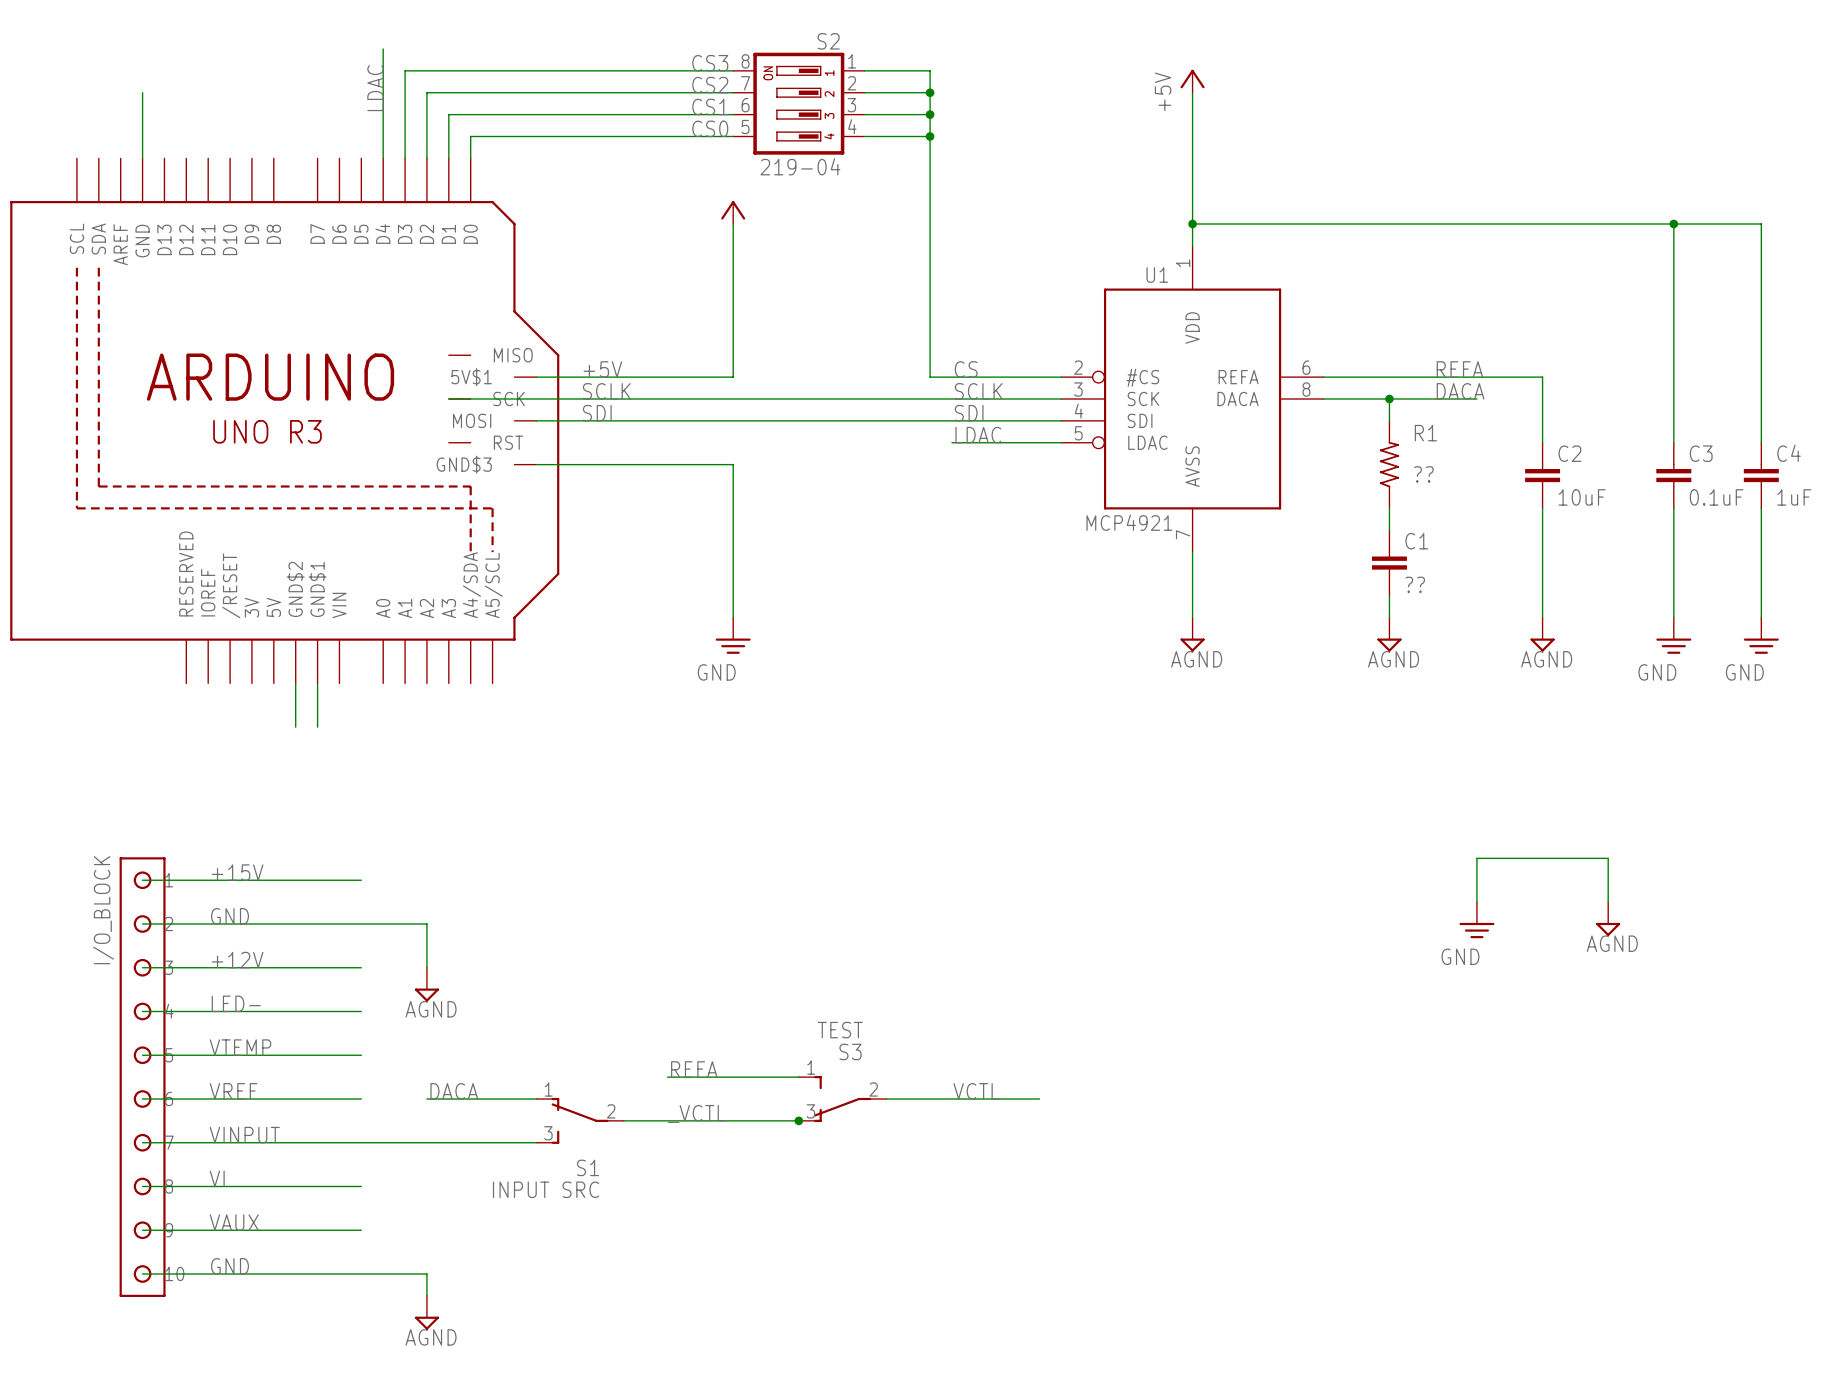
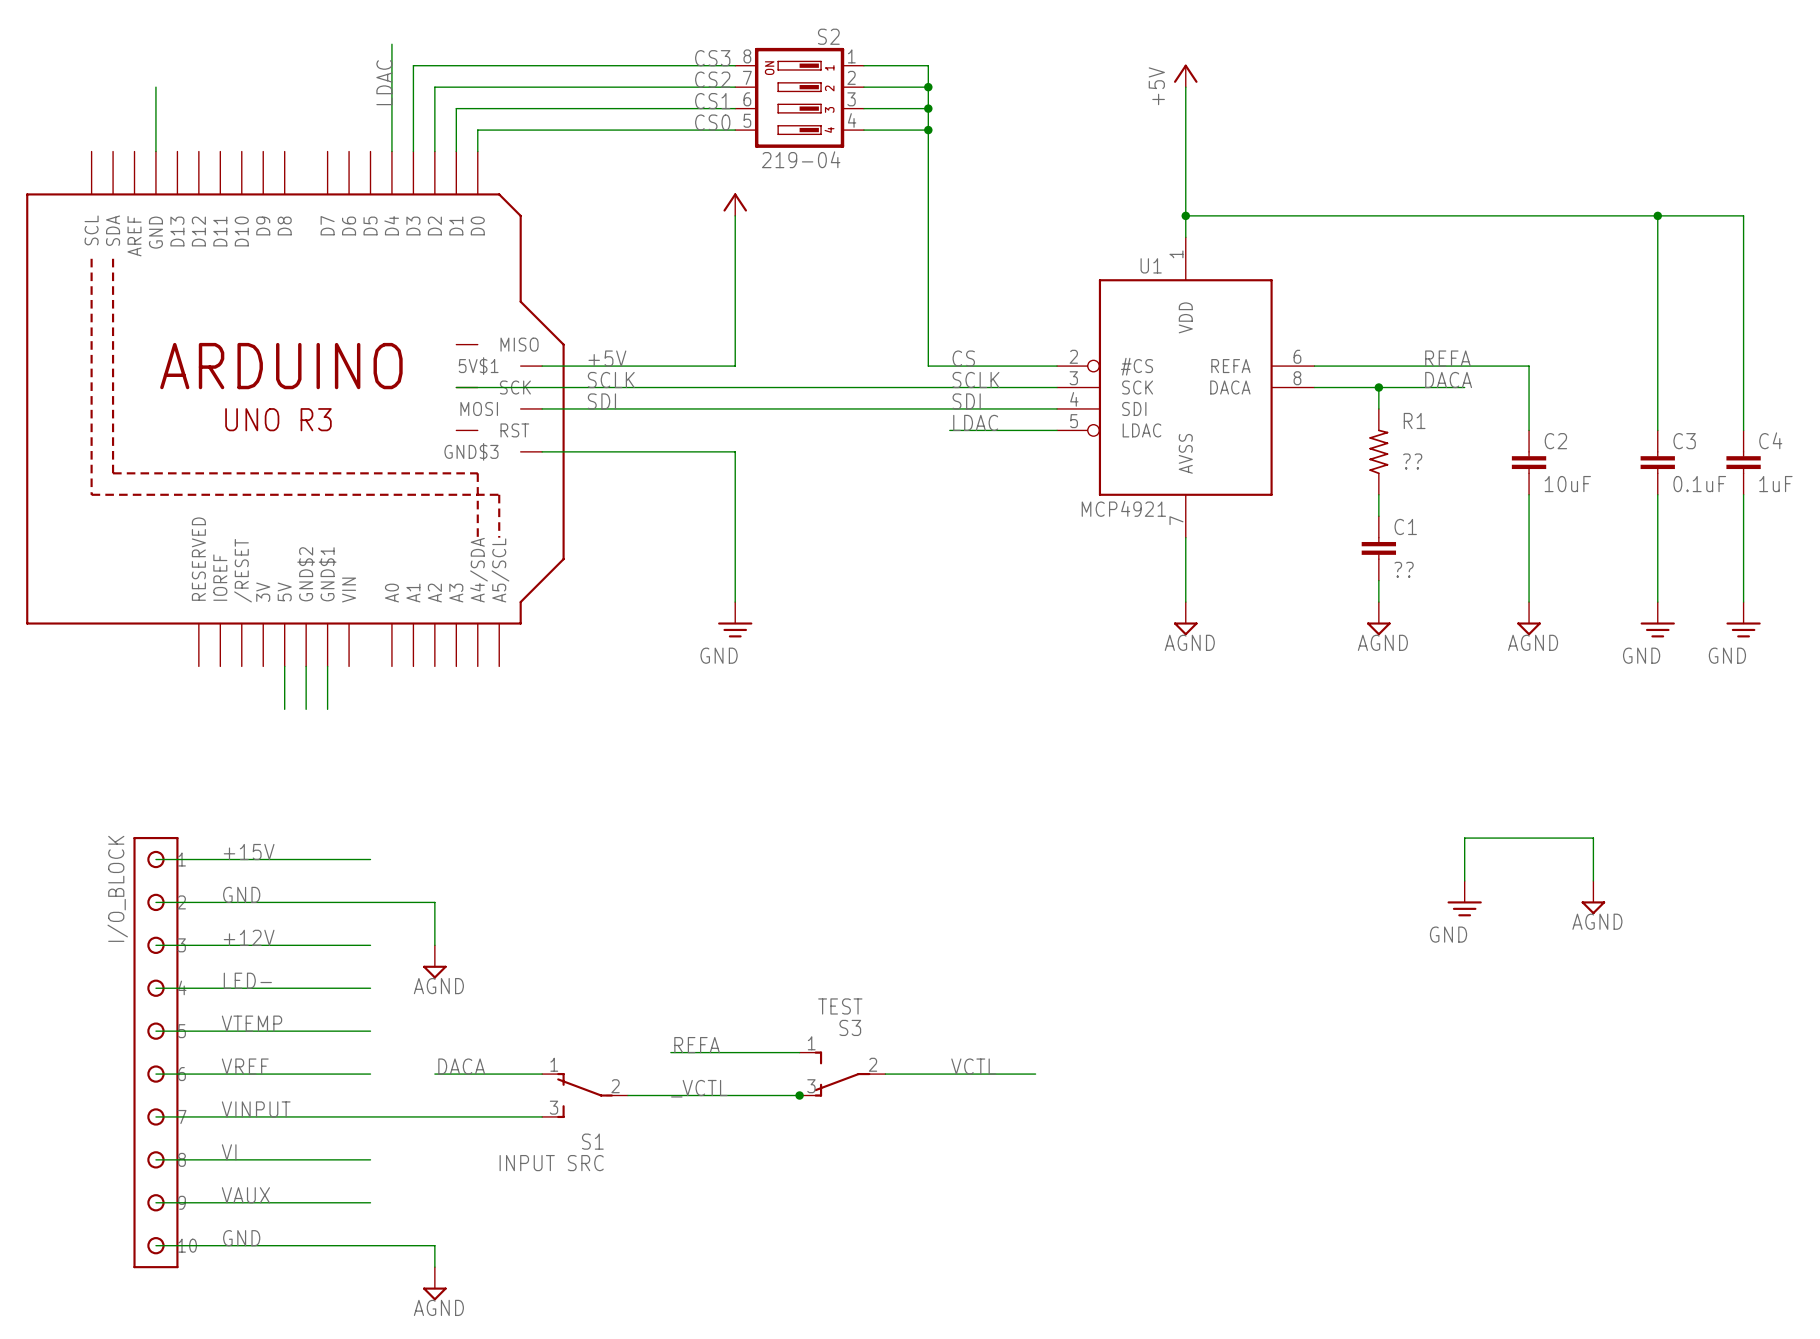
wire: none -> (284, 666) (284, 709)

